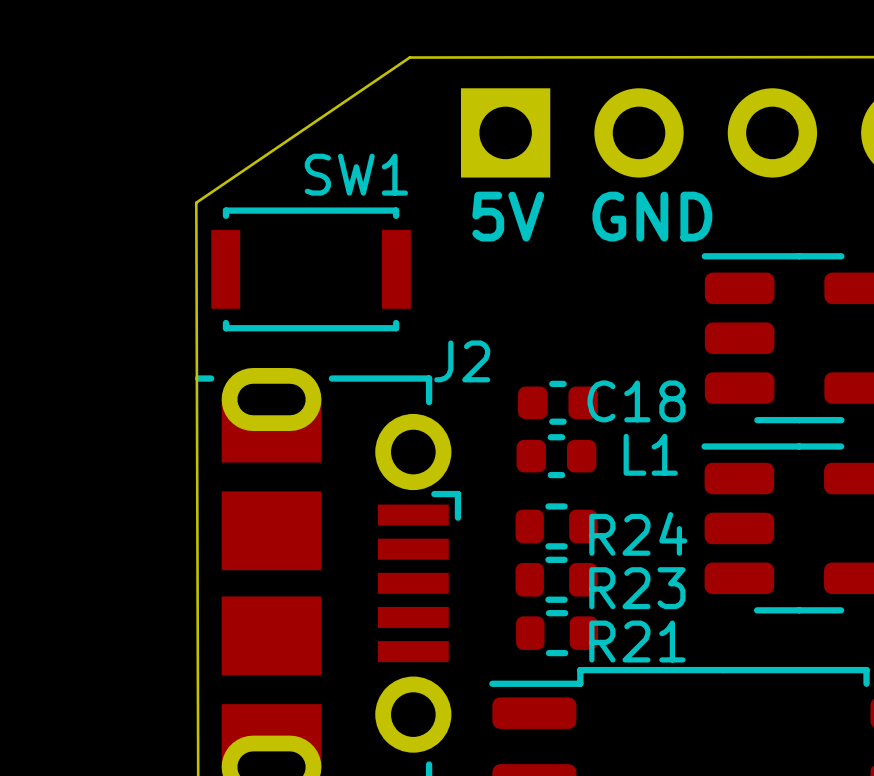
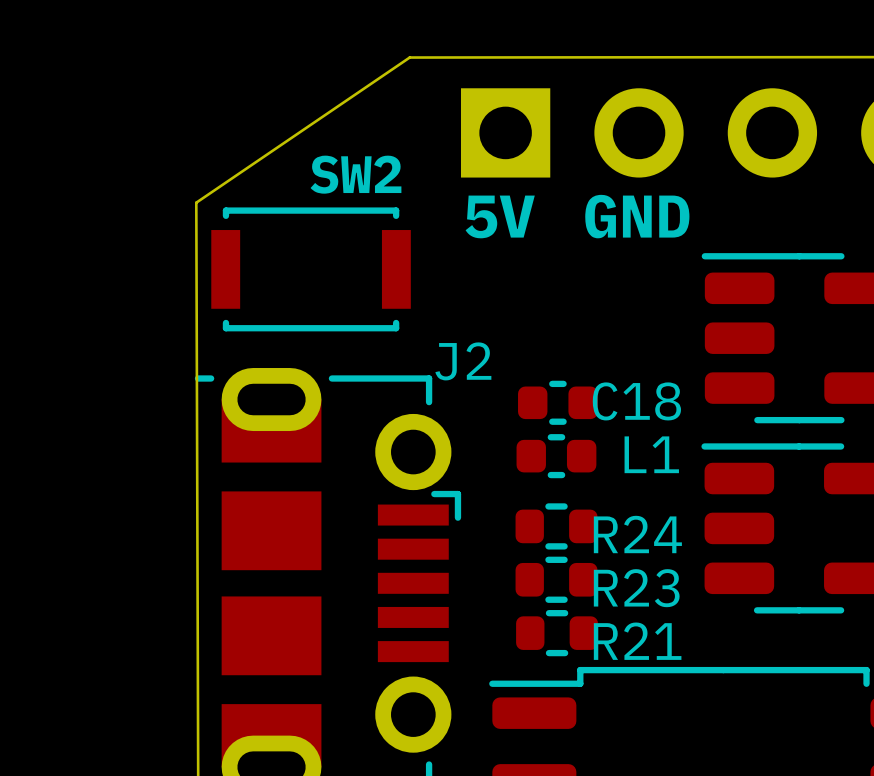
SW1 name: SW1 (356, 174) -> SW2 (356, 174)

